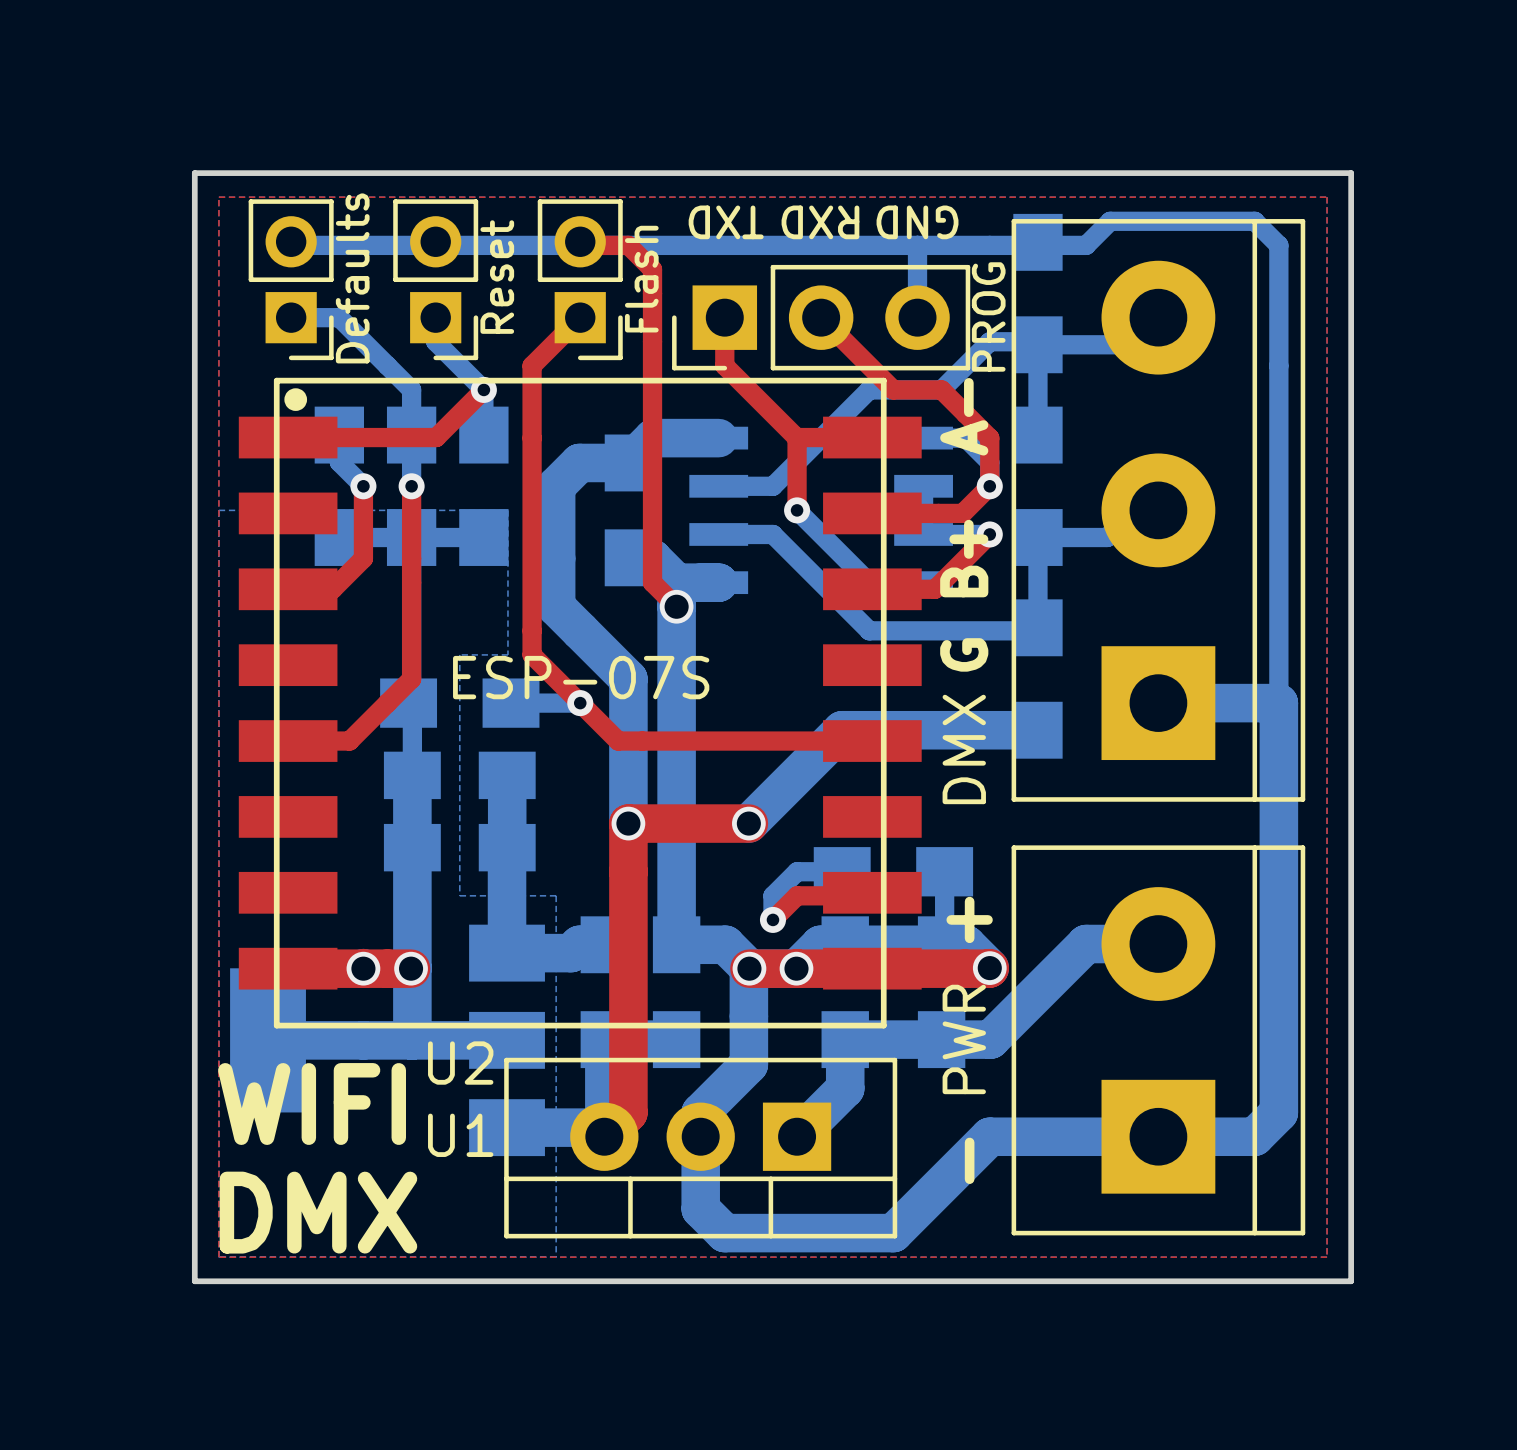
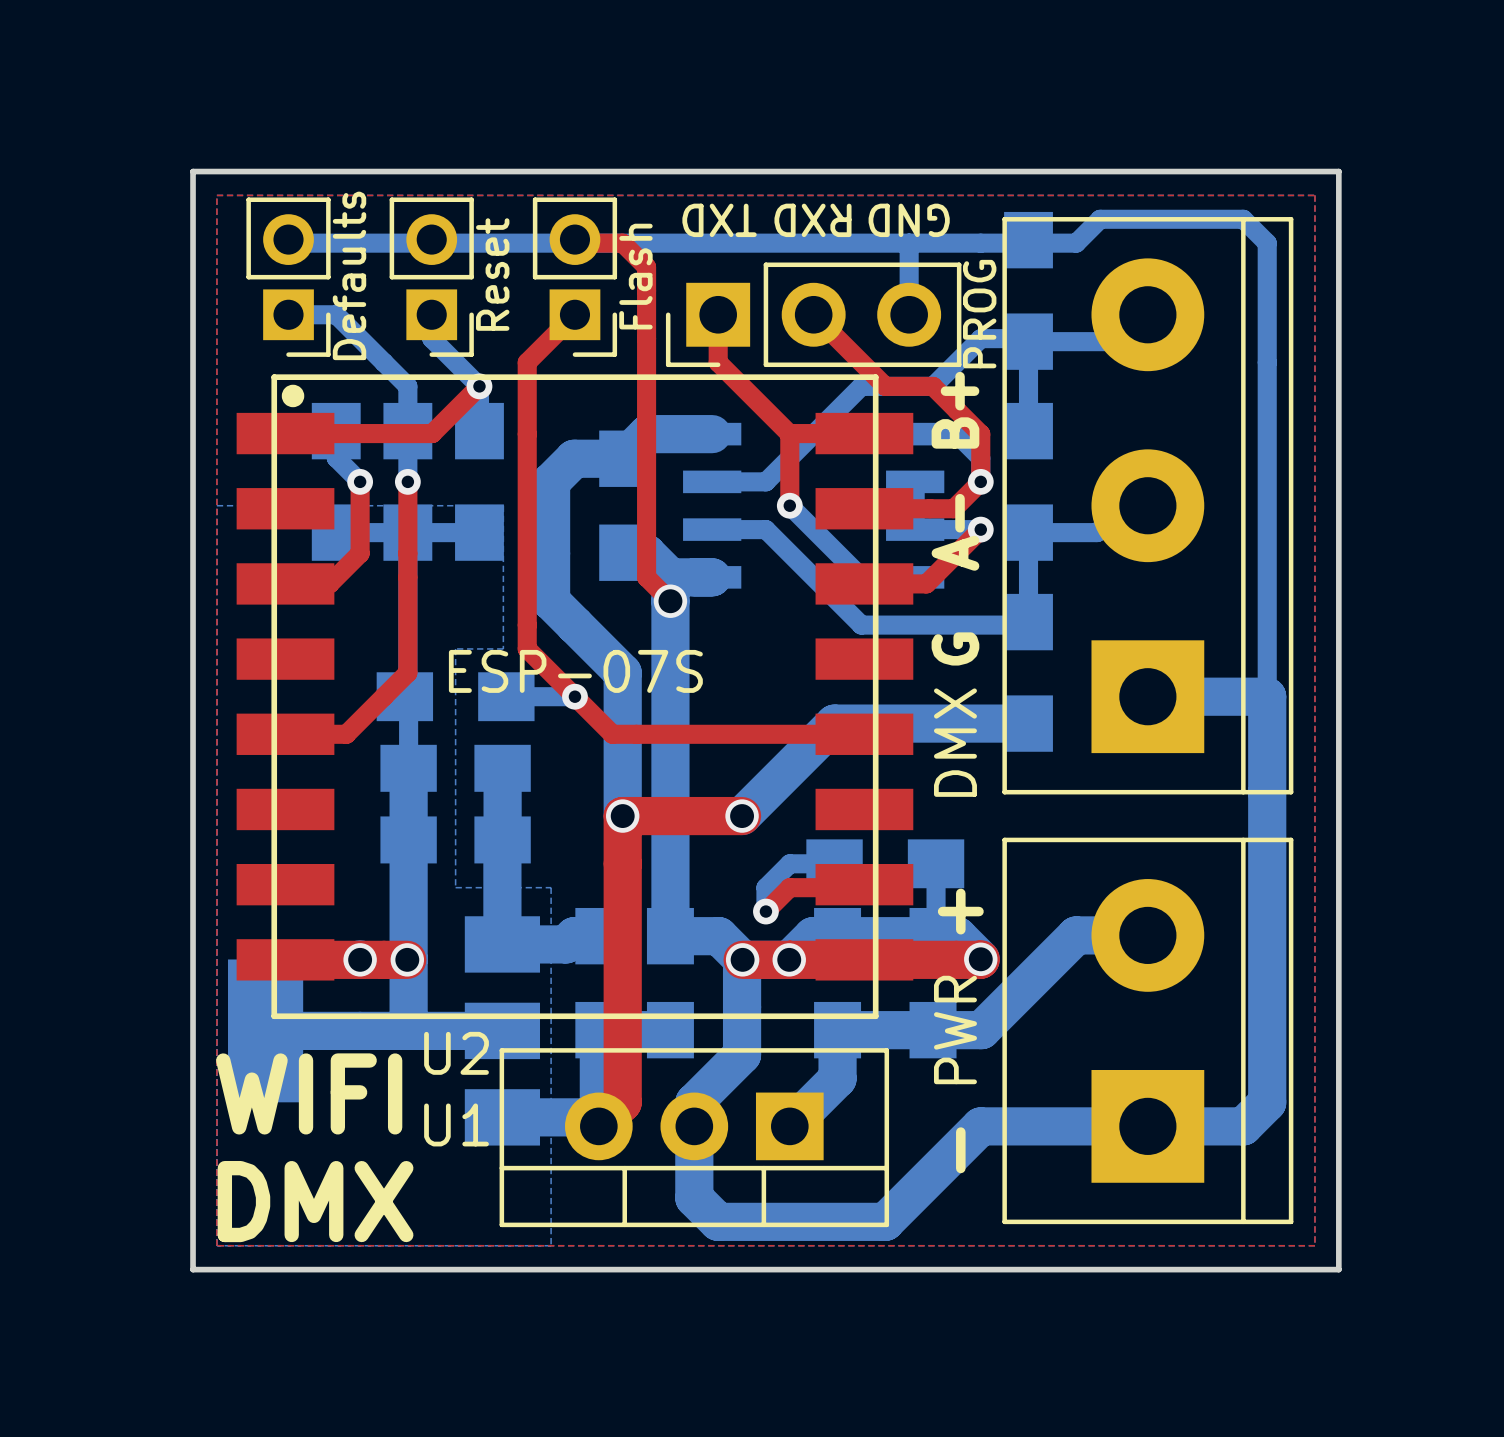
text: A- (964, 416) -> B+ (955, 410)
text: B+ (964, 558) -> A- (955, 532)

